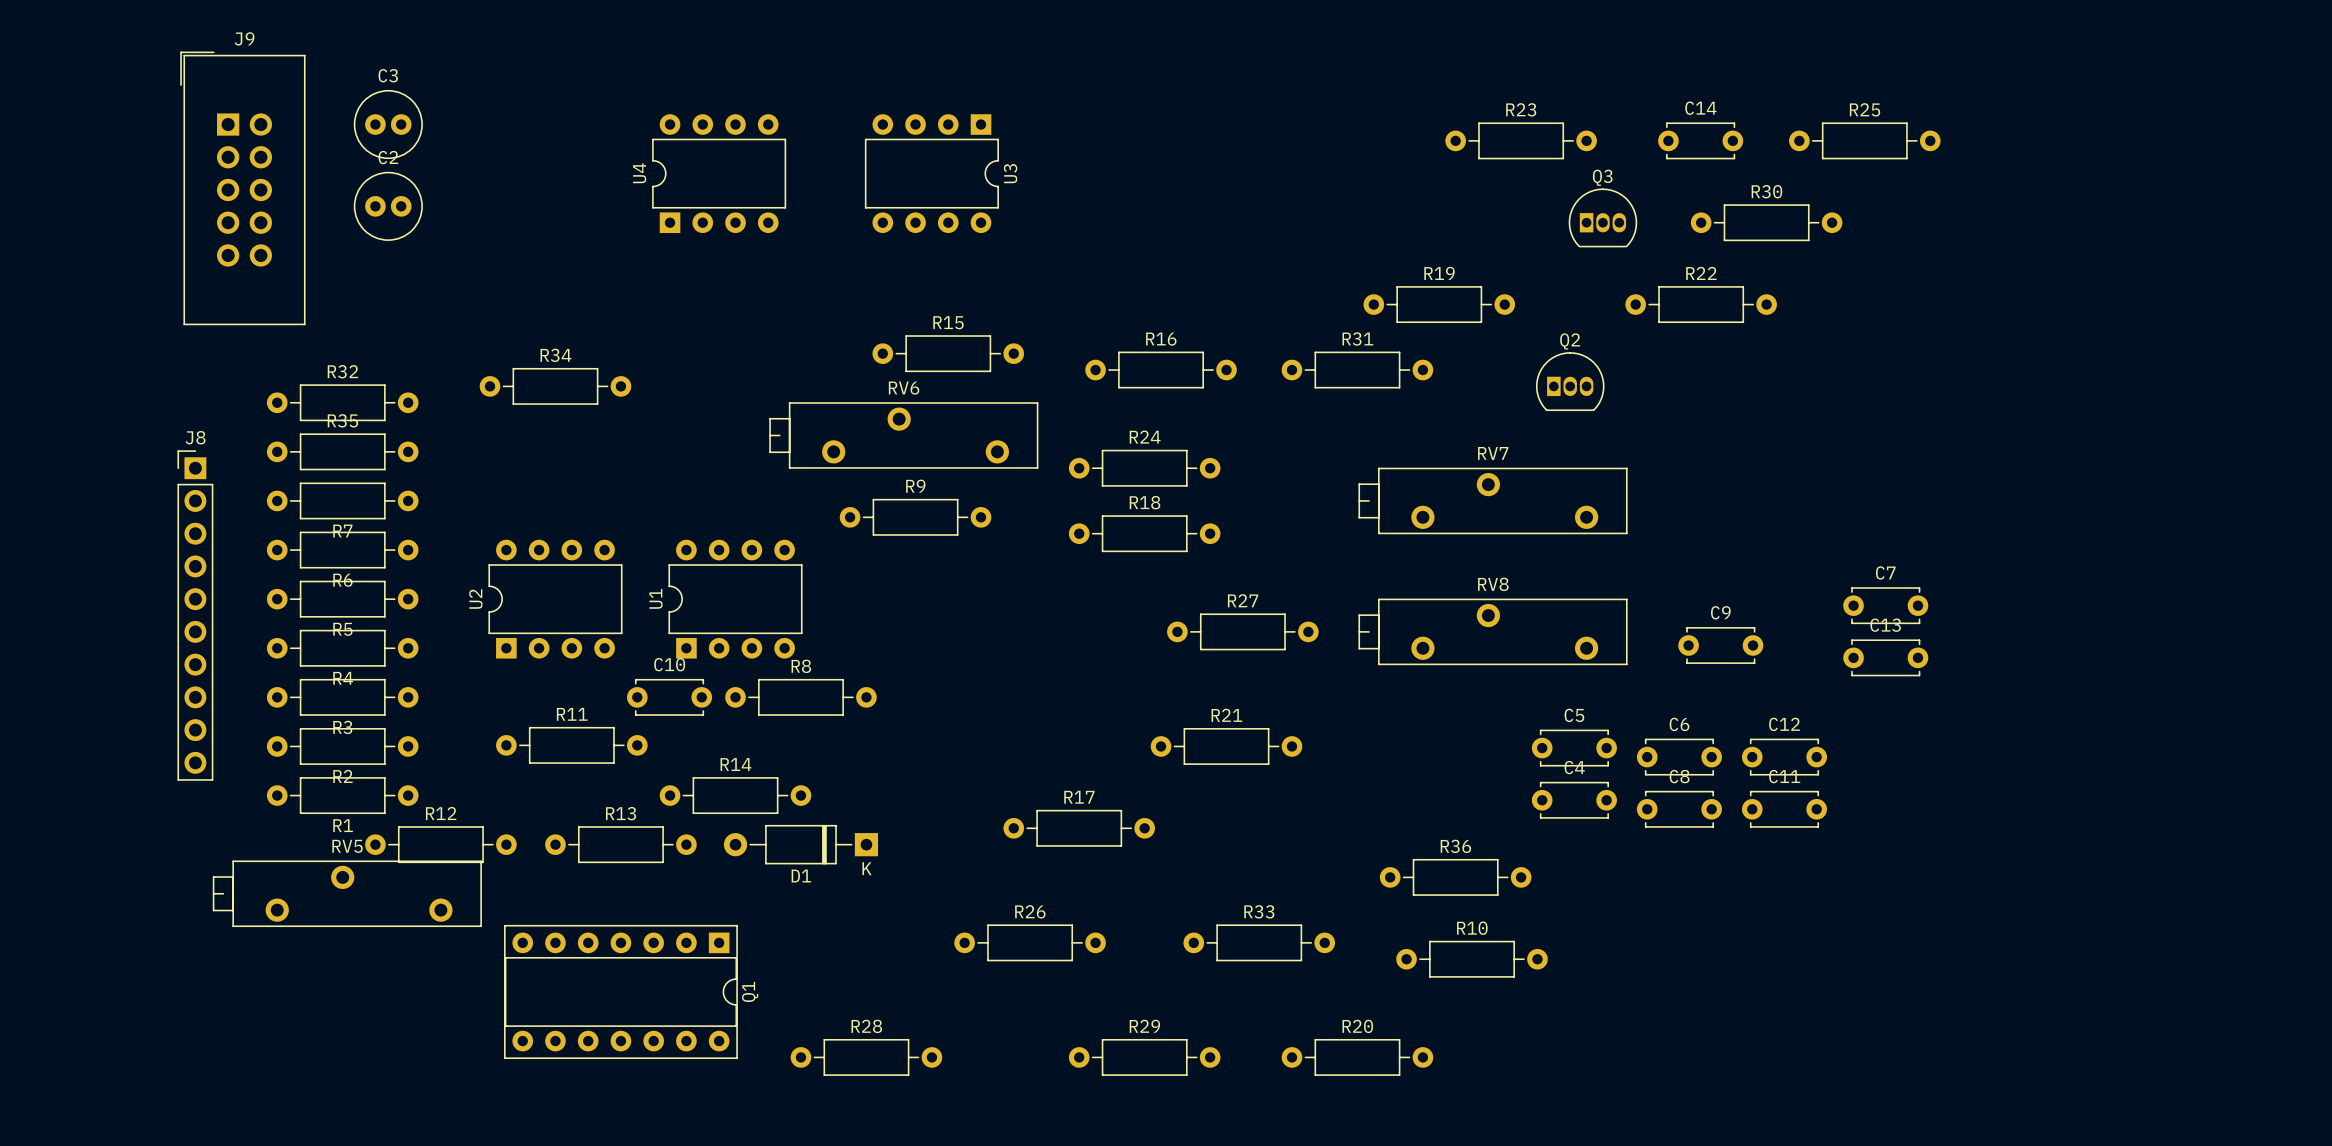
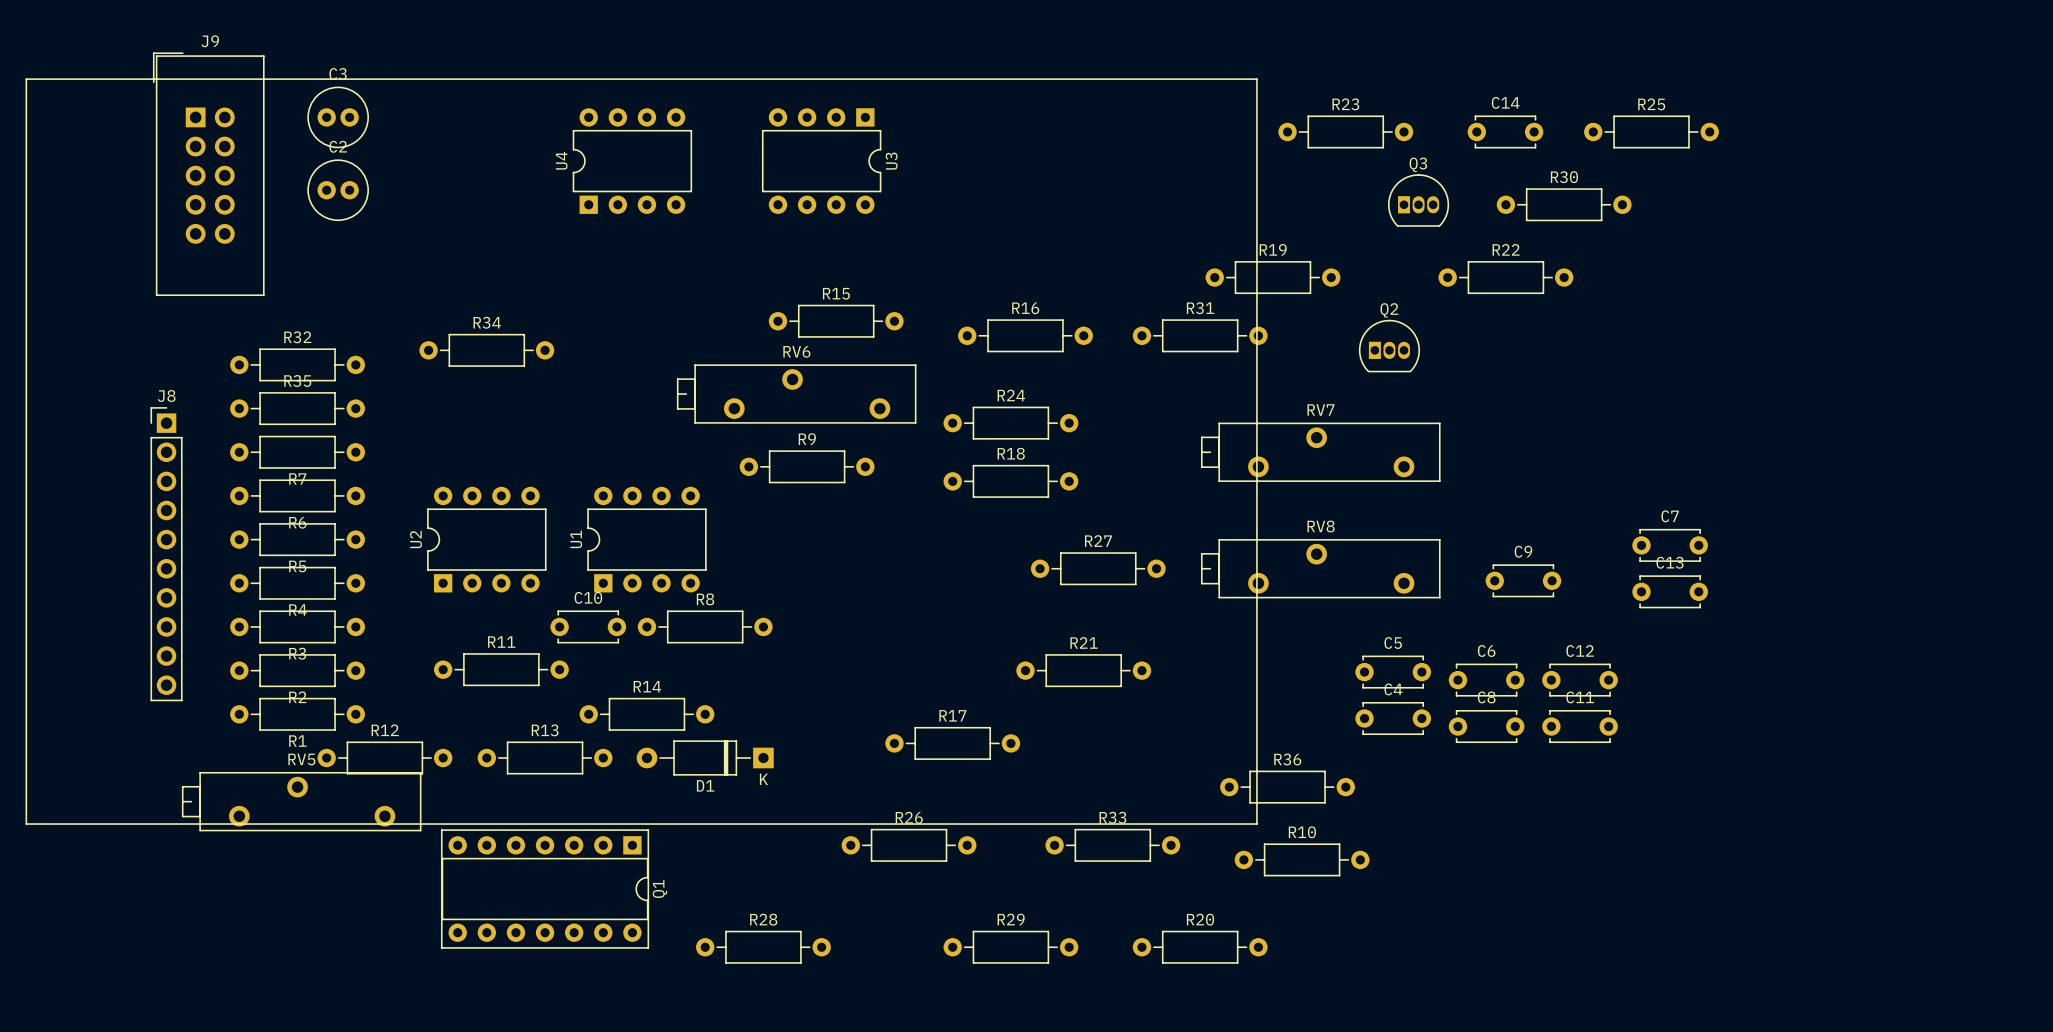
line: none -> (26, 79) (1256, 79) (1256, 824) (26, 824) (26, 79)

